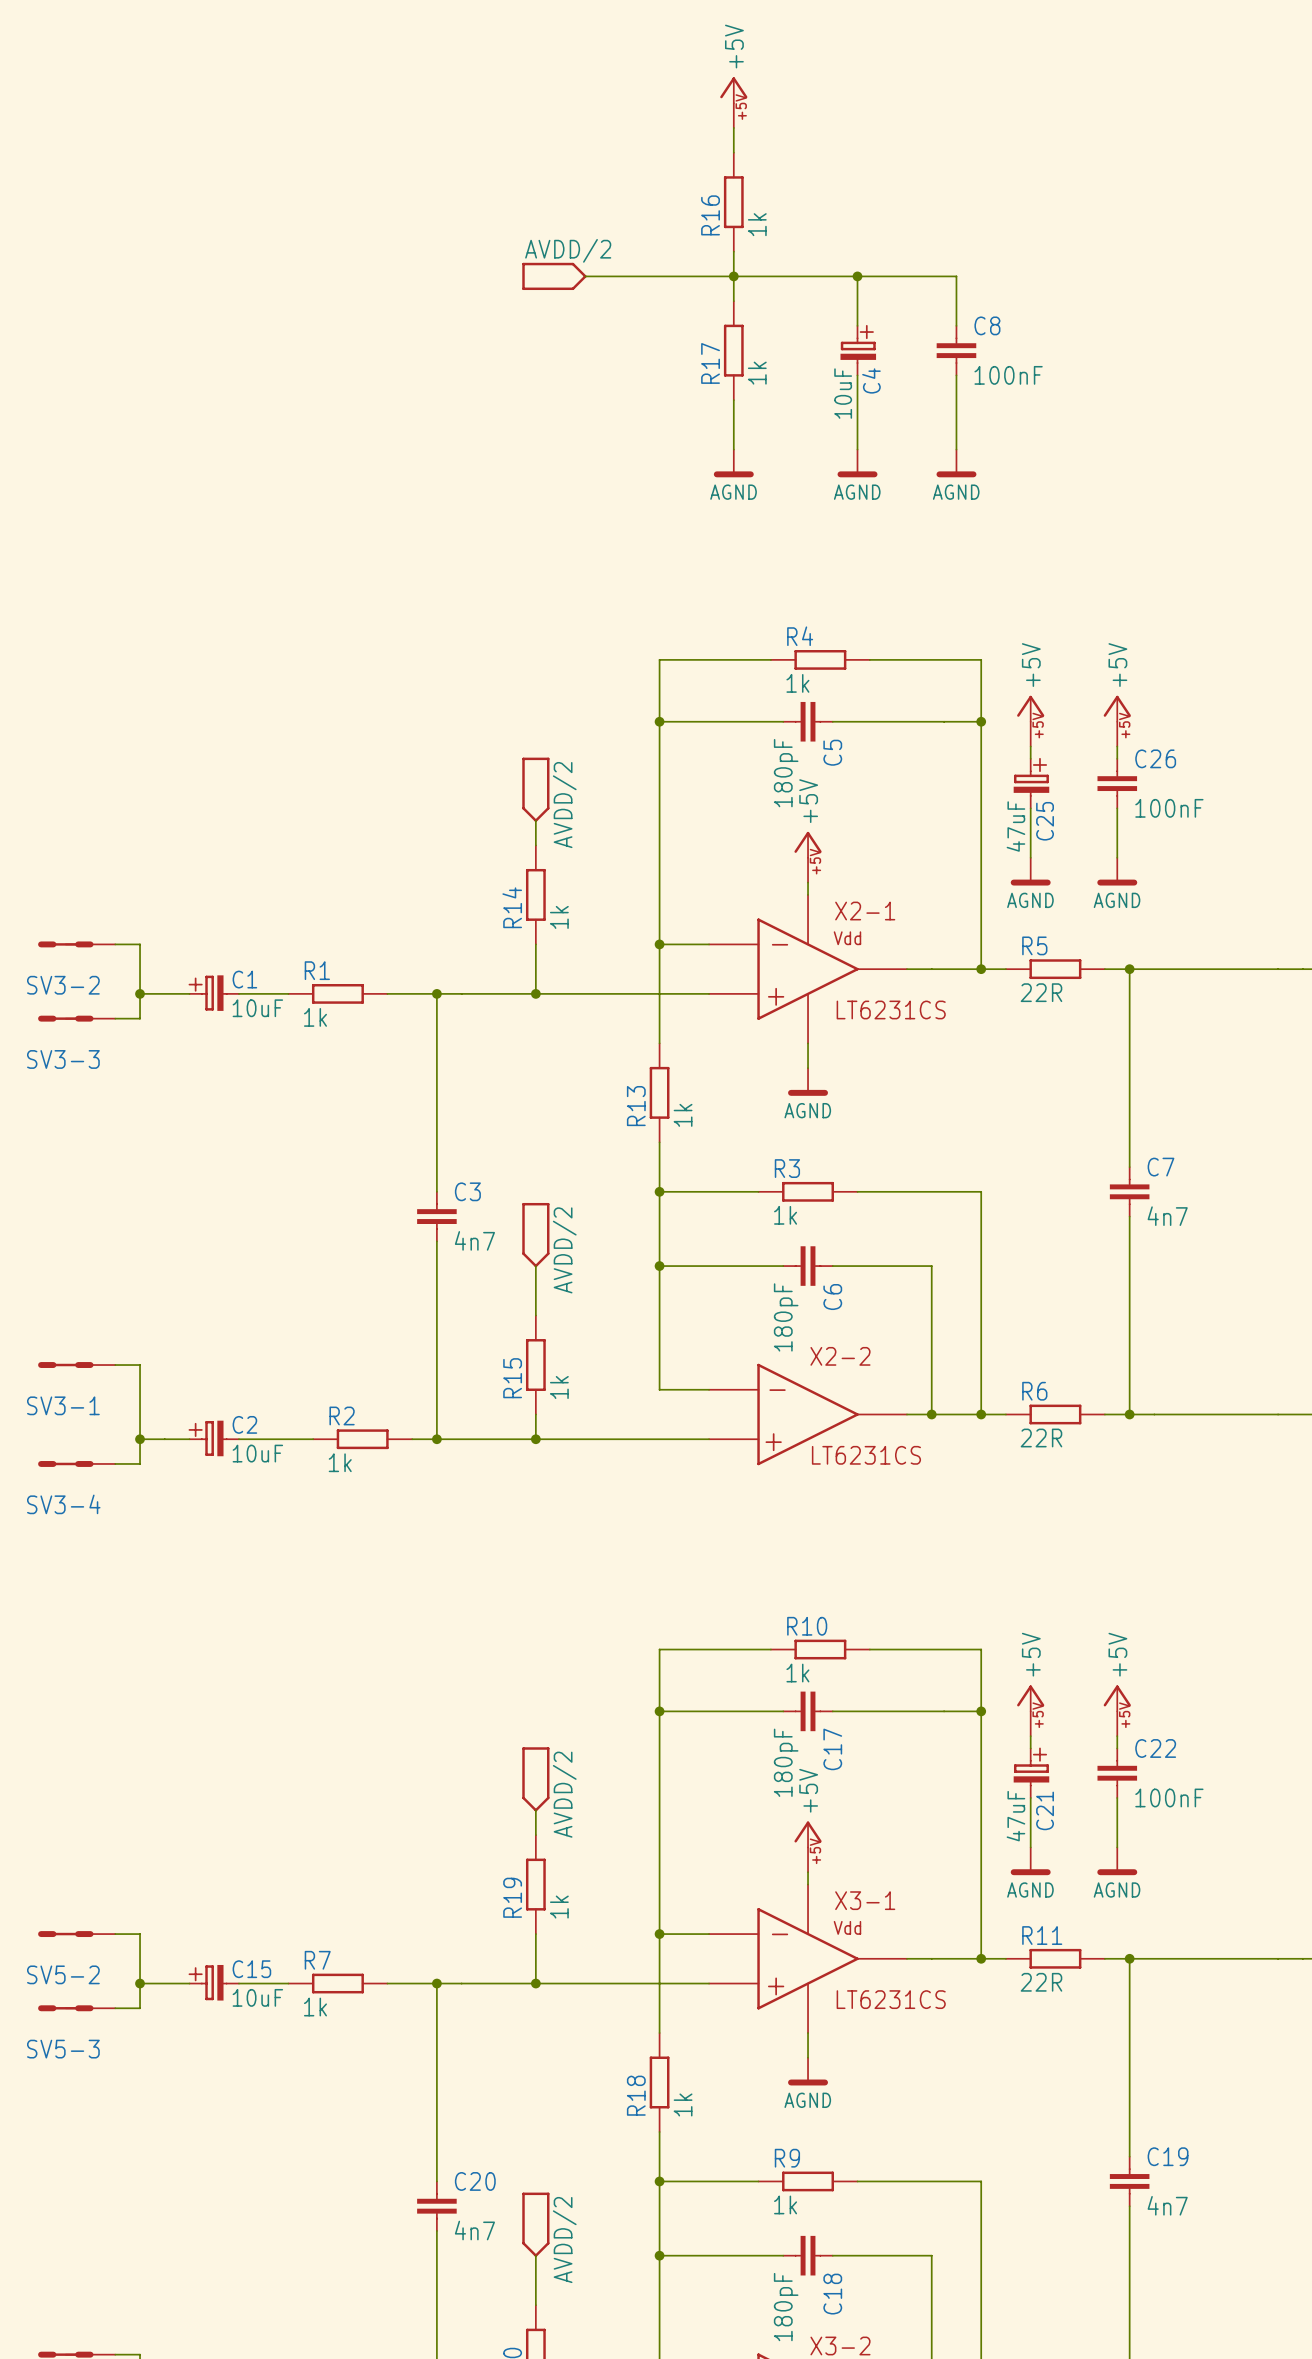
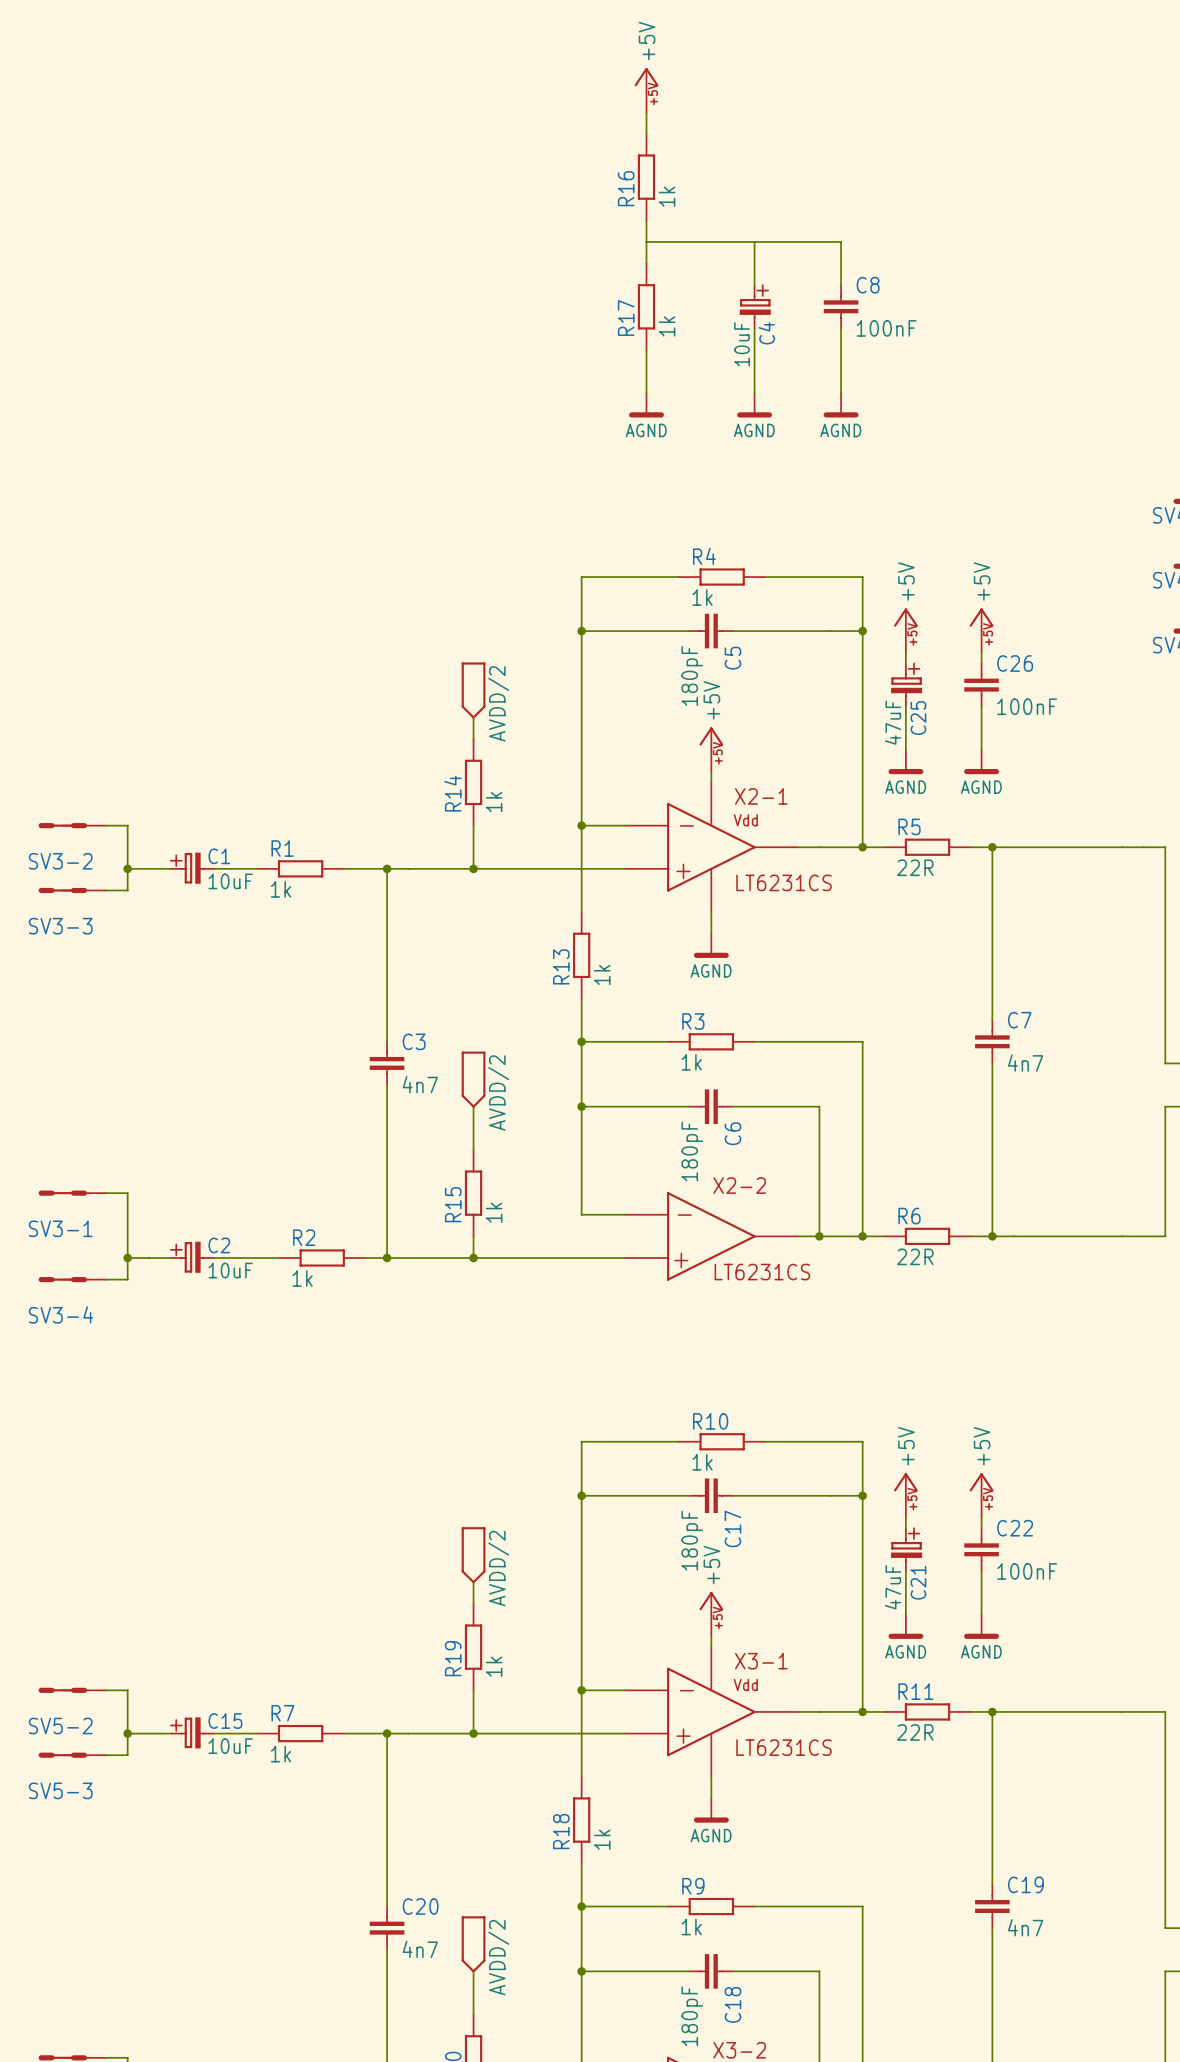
part: AVDD/2 (554, 276) -> none
wire: (585, 276) (733, 276) -> none
junction: (733, 276) -> none
junction: (857, 276) -> none

